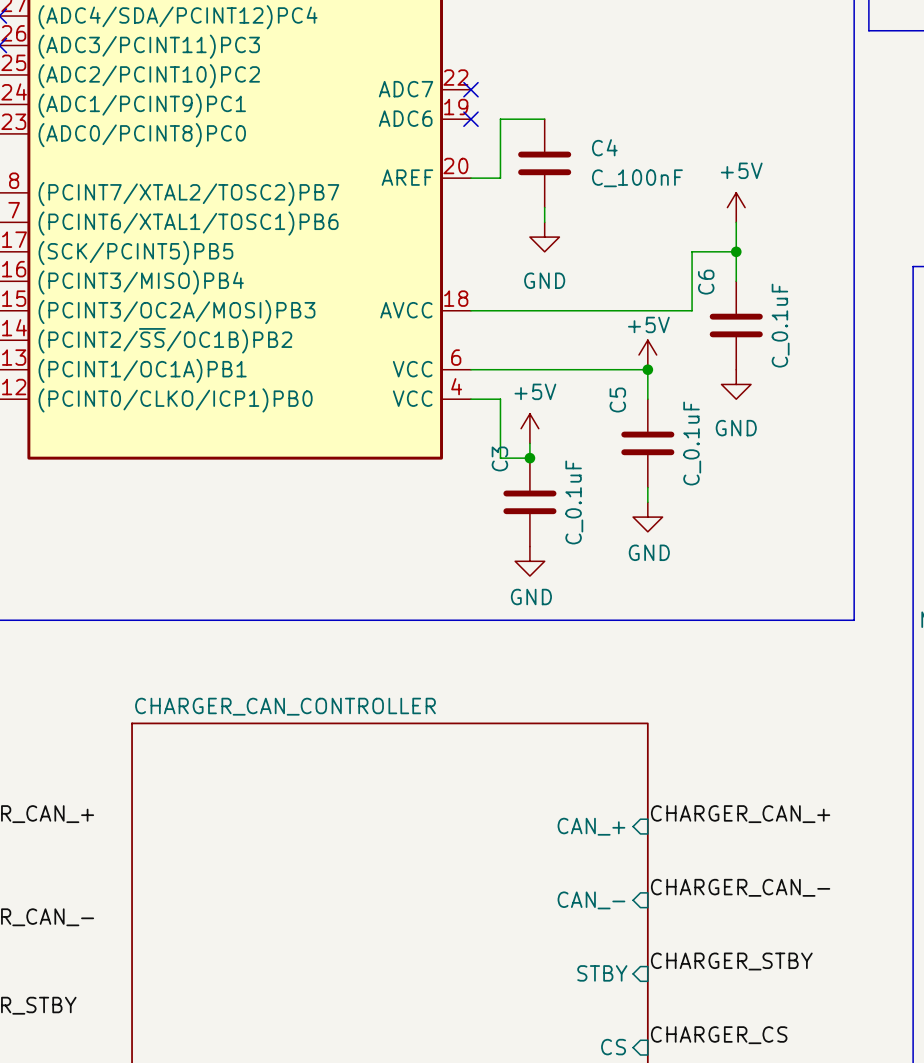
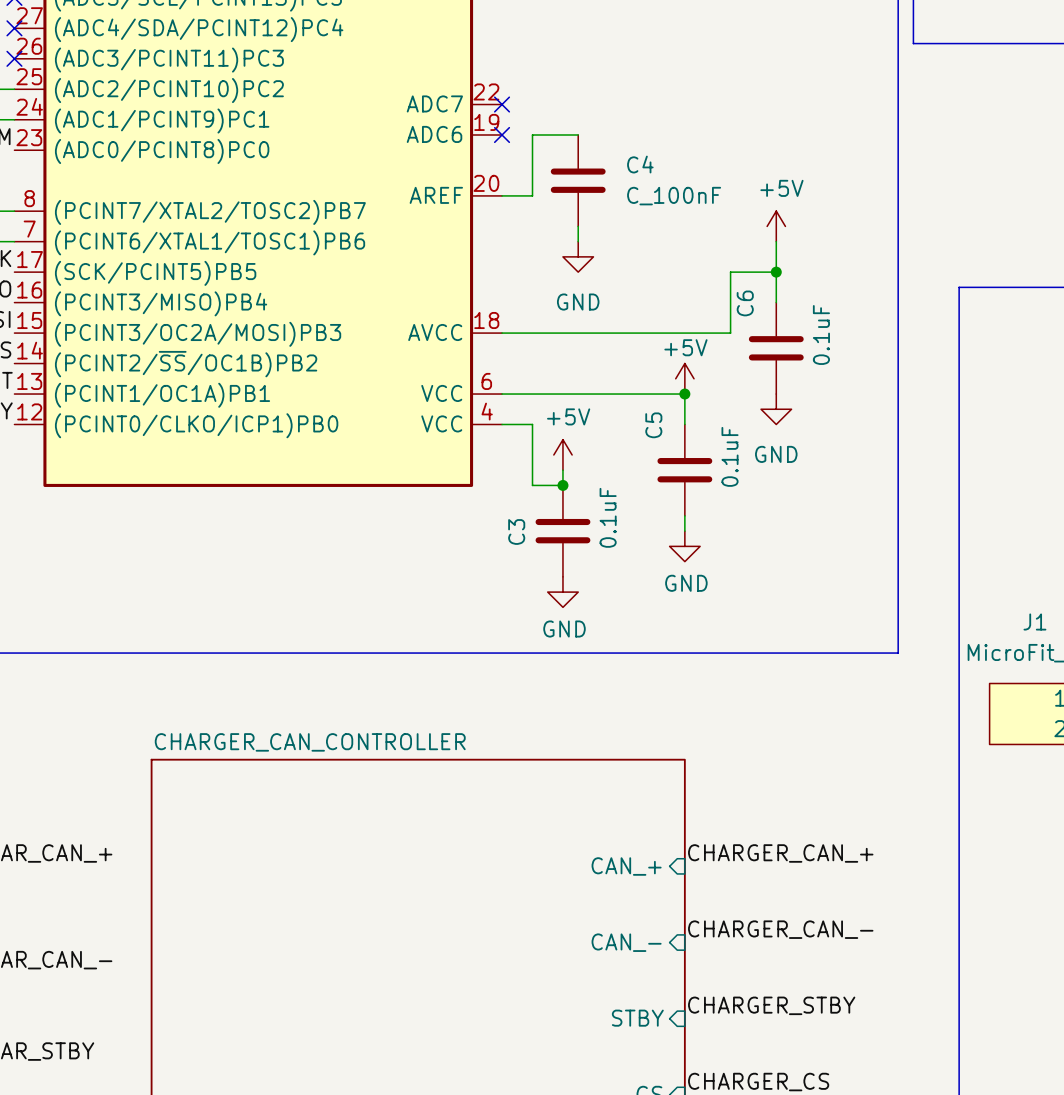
C6 value: C_0.1uF (780, 325) -> 0.1uF (821, 335)
C5 value: C_0.1uF (692, 443) -> 0.1uF (730, 456)
C3 name position: C3 (499, 458) -> C3 (516, 531)
C3 value: C_0.1uF (574, 502) -> 0.1uF (608, 517)

